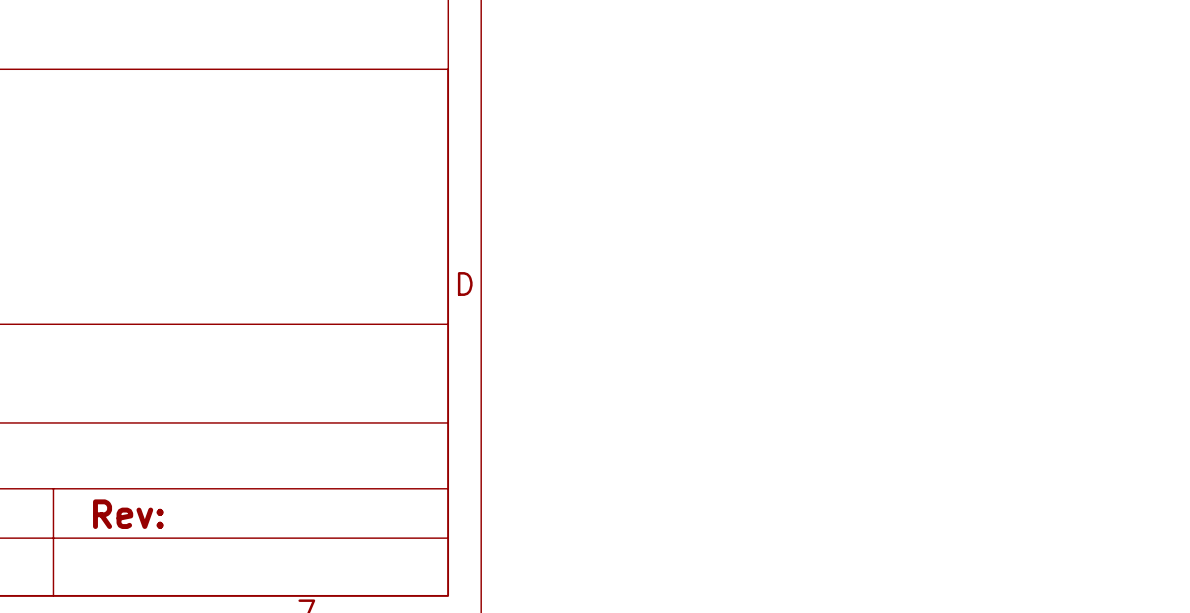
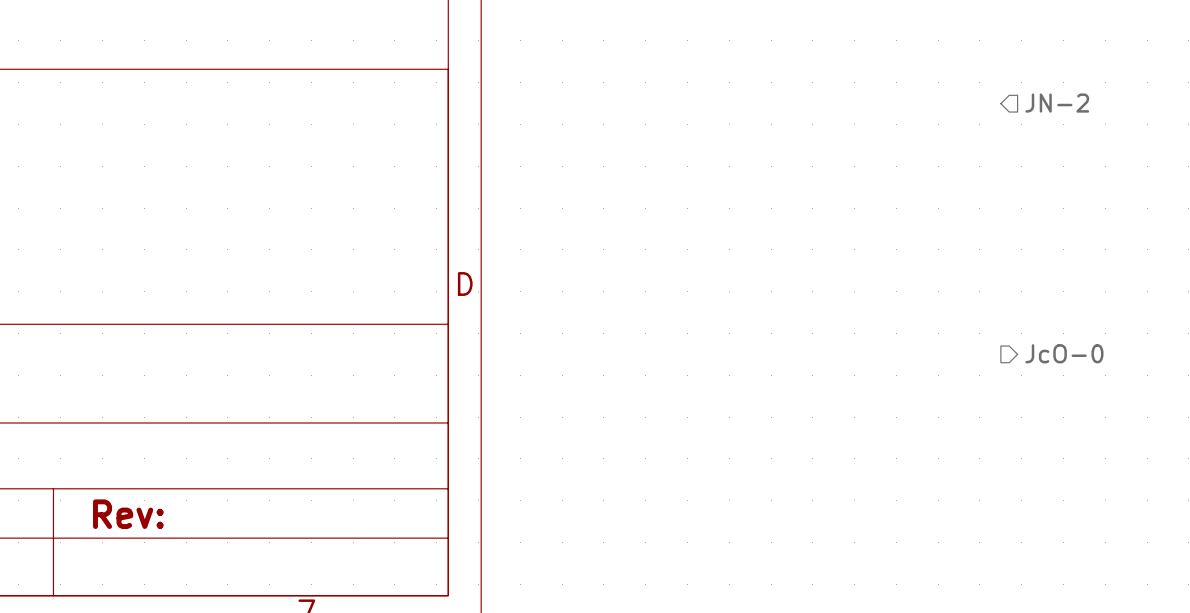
hierarchical label: none -> JN-2 (1057, 103)
hierarchical label: none -> JcO-0 (1064, 353)

